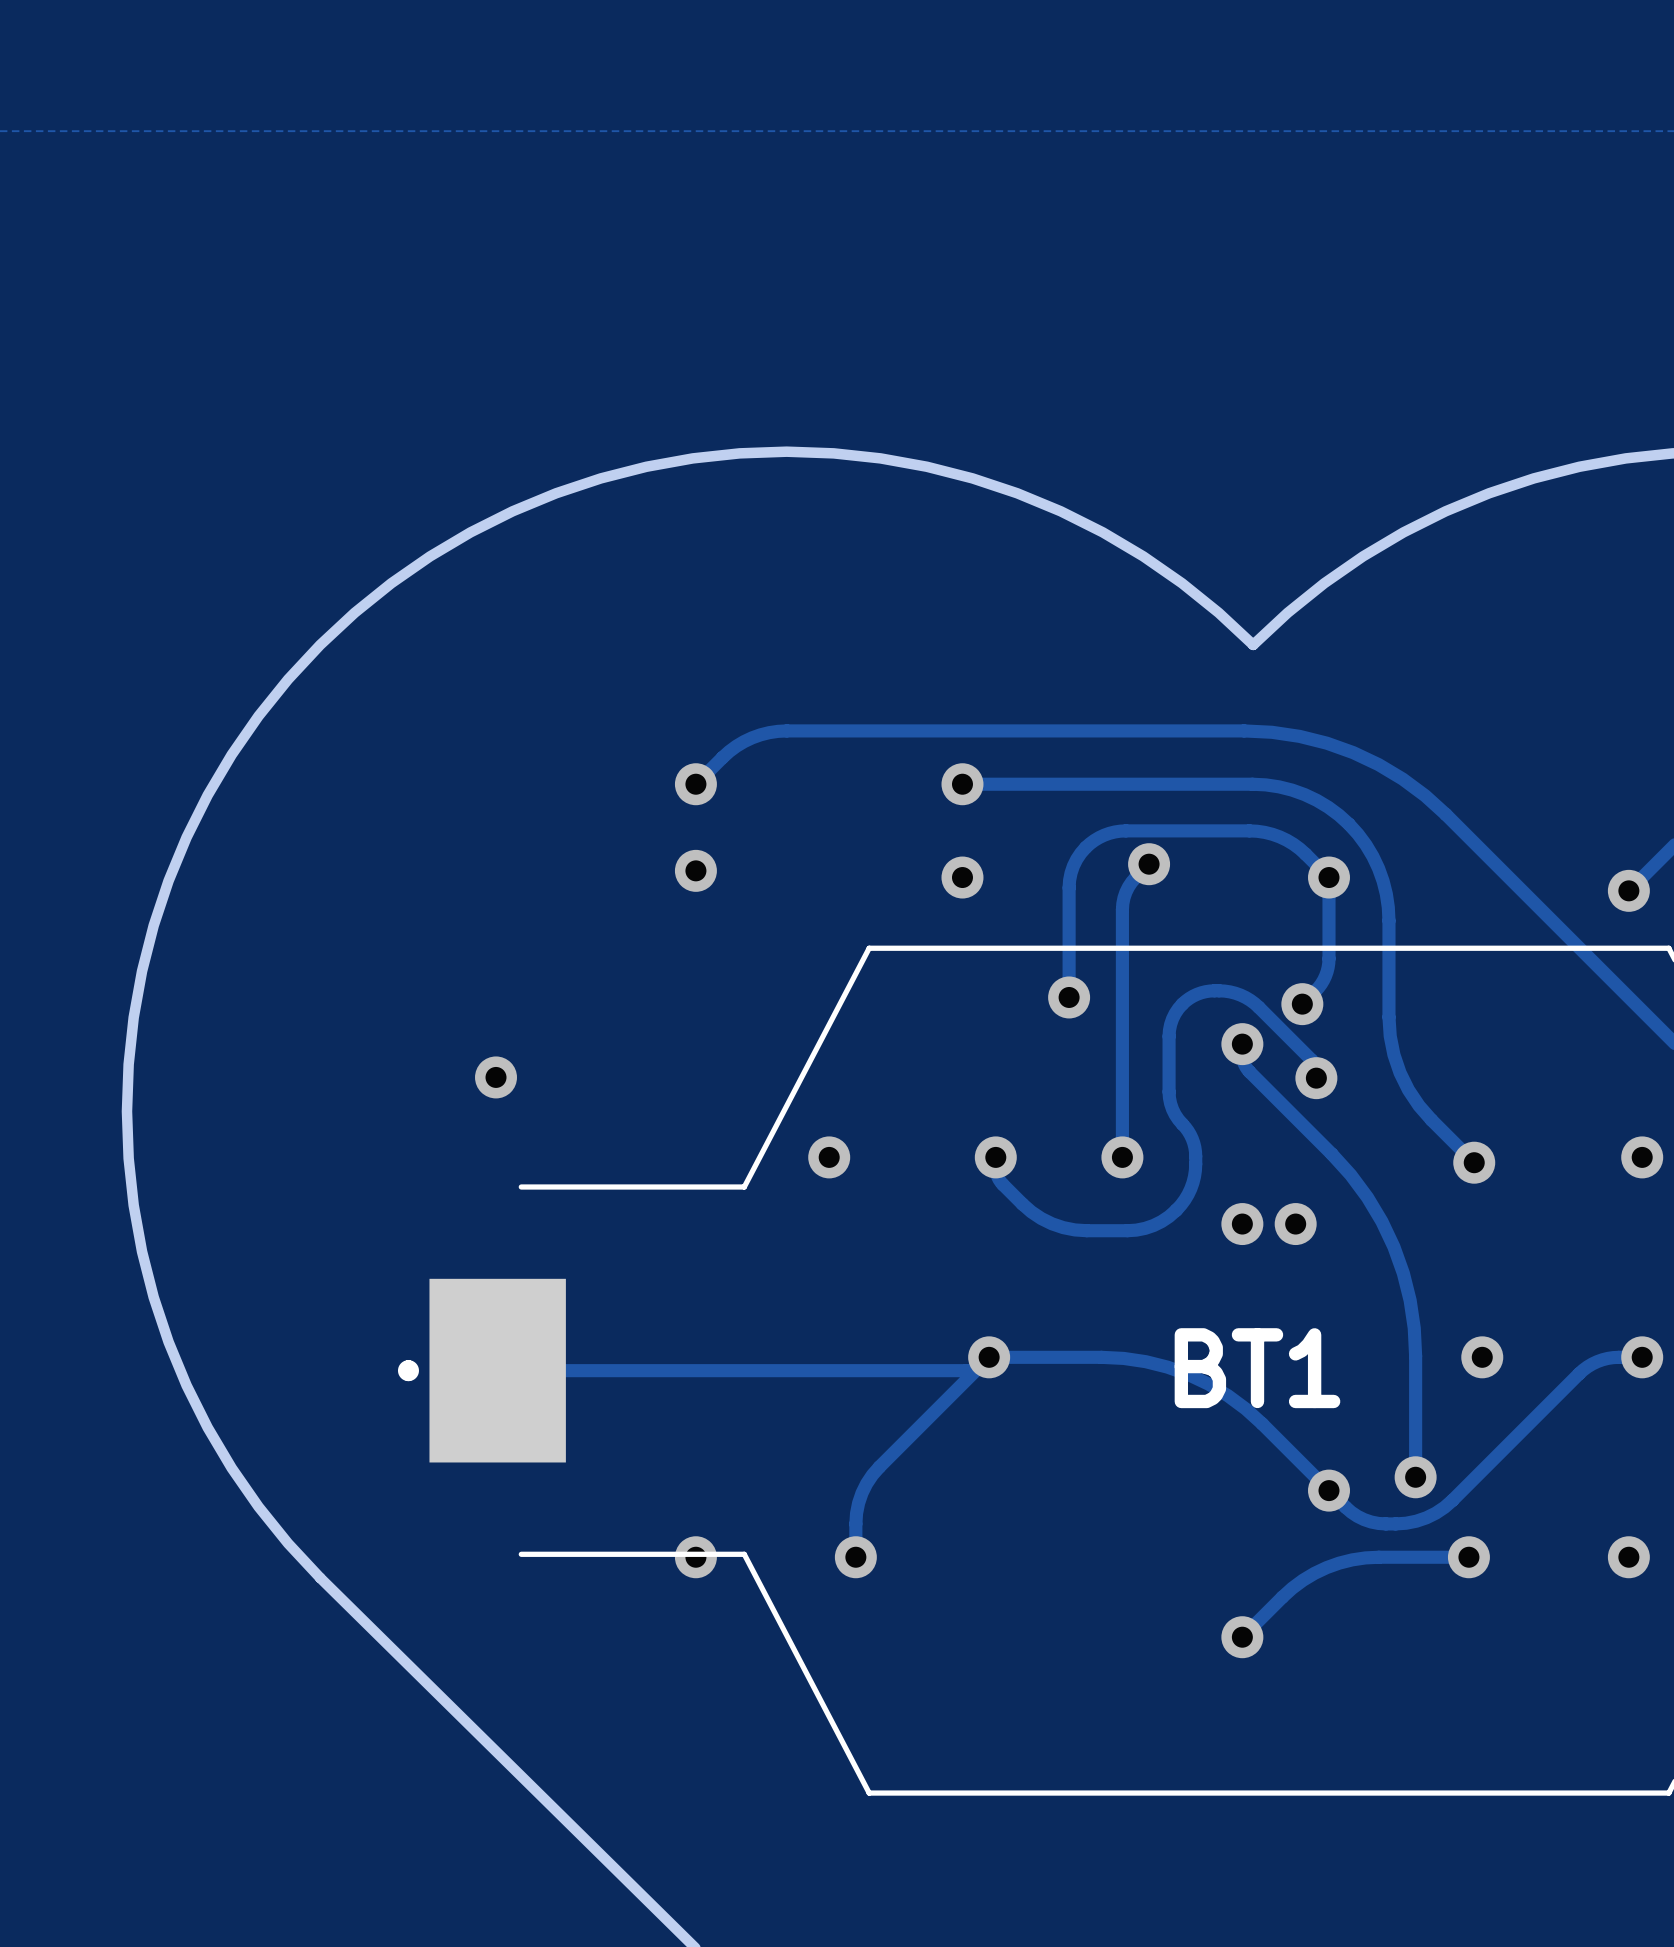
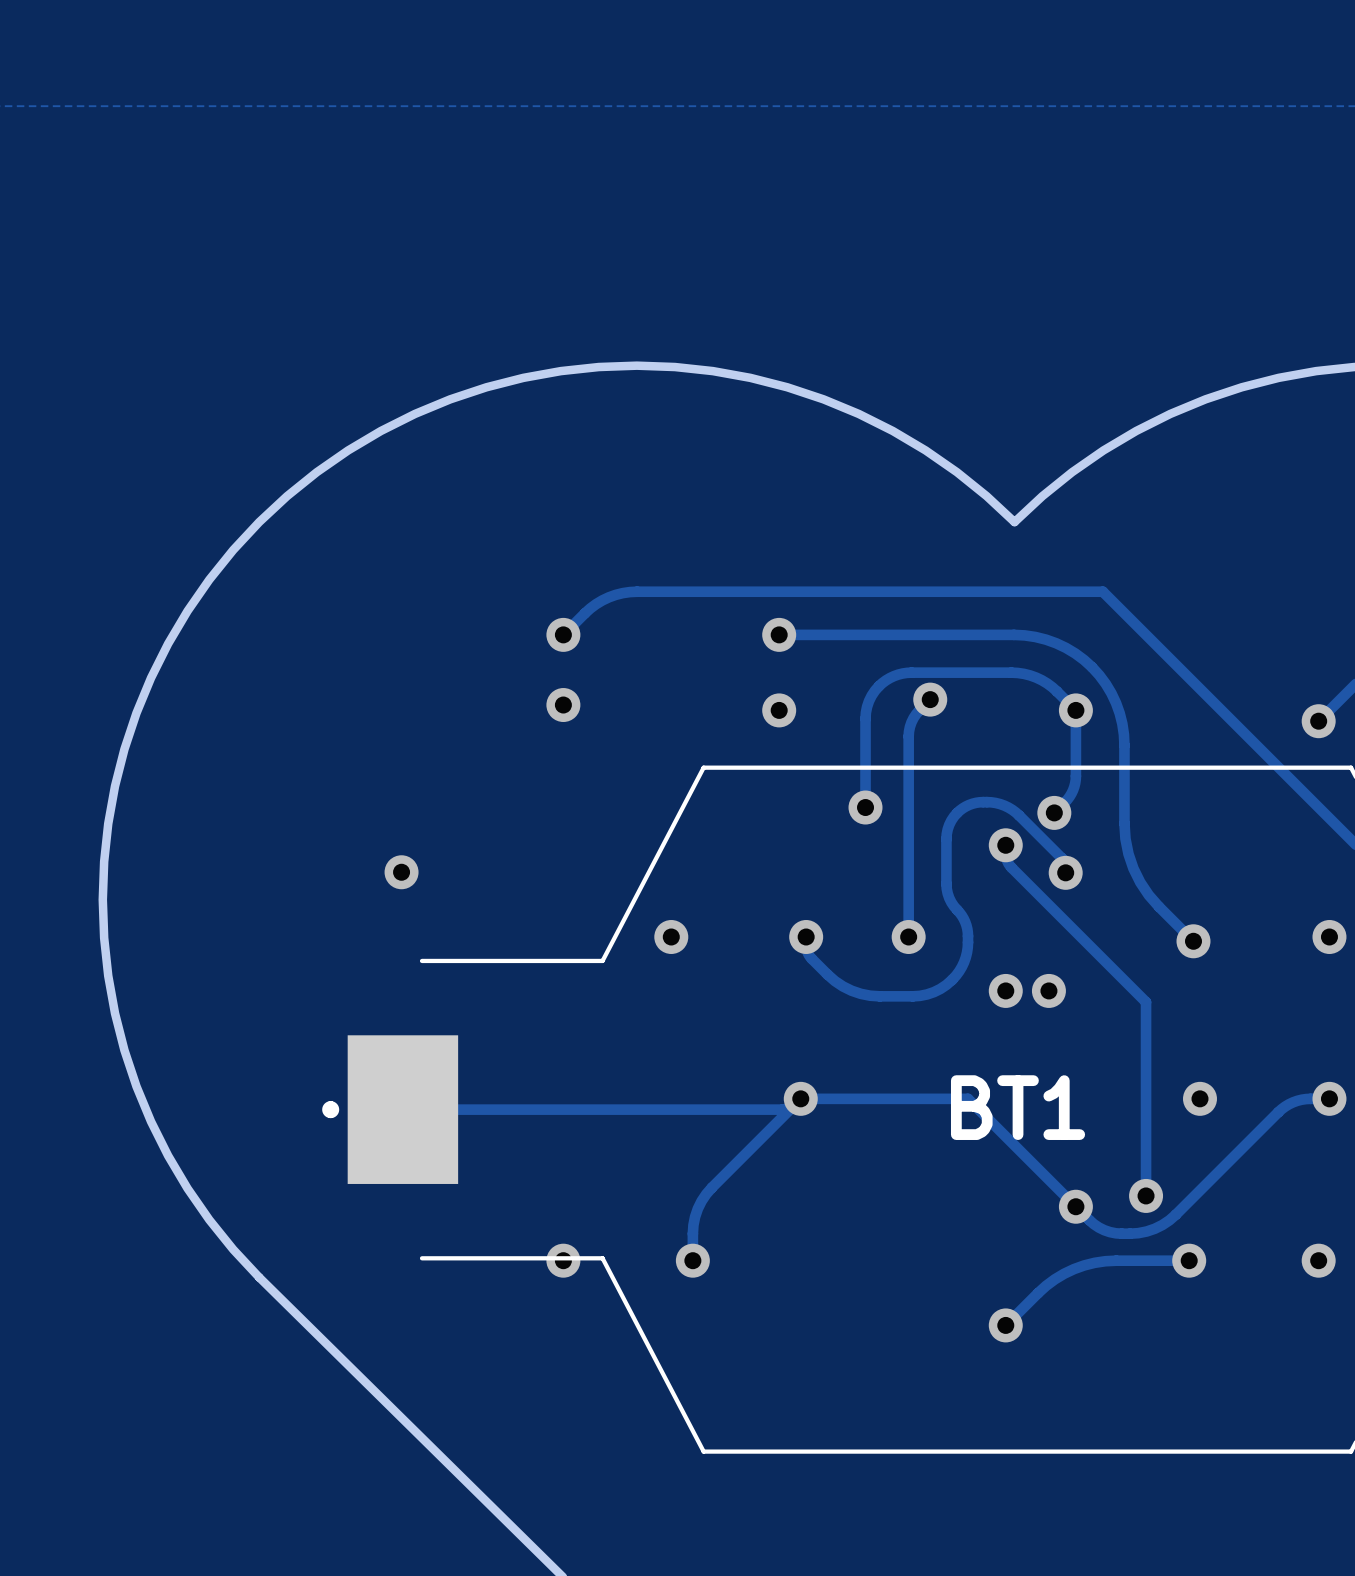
track: (1244, 730) (1299, 736) (1353, 752) (1402, 779) (1445, 814) -> (1007, 591) (1102, 591) (1170, 659)
track: (1332, 1154) (1367, 1197) (1393, 1246) (1410, 1300) (1415, 1356) -> (1078, 934) (1146, 1002) (1146, 1097)
track: (1101, 1357) (1145, 1361) (1188, 1374) (1227, 1395) (1262, 1423) -> (891, 1098) (968, 1098) (1021, 1152)

